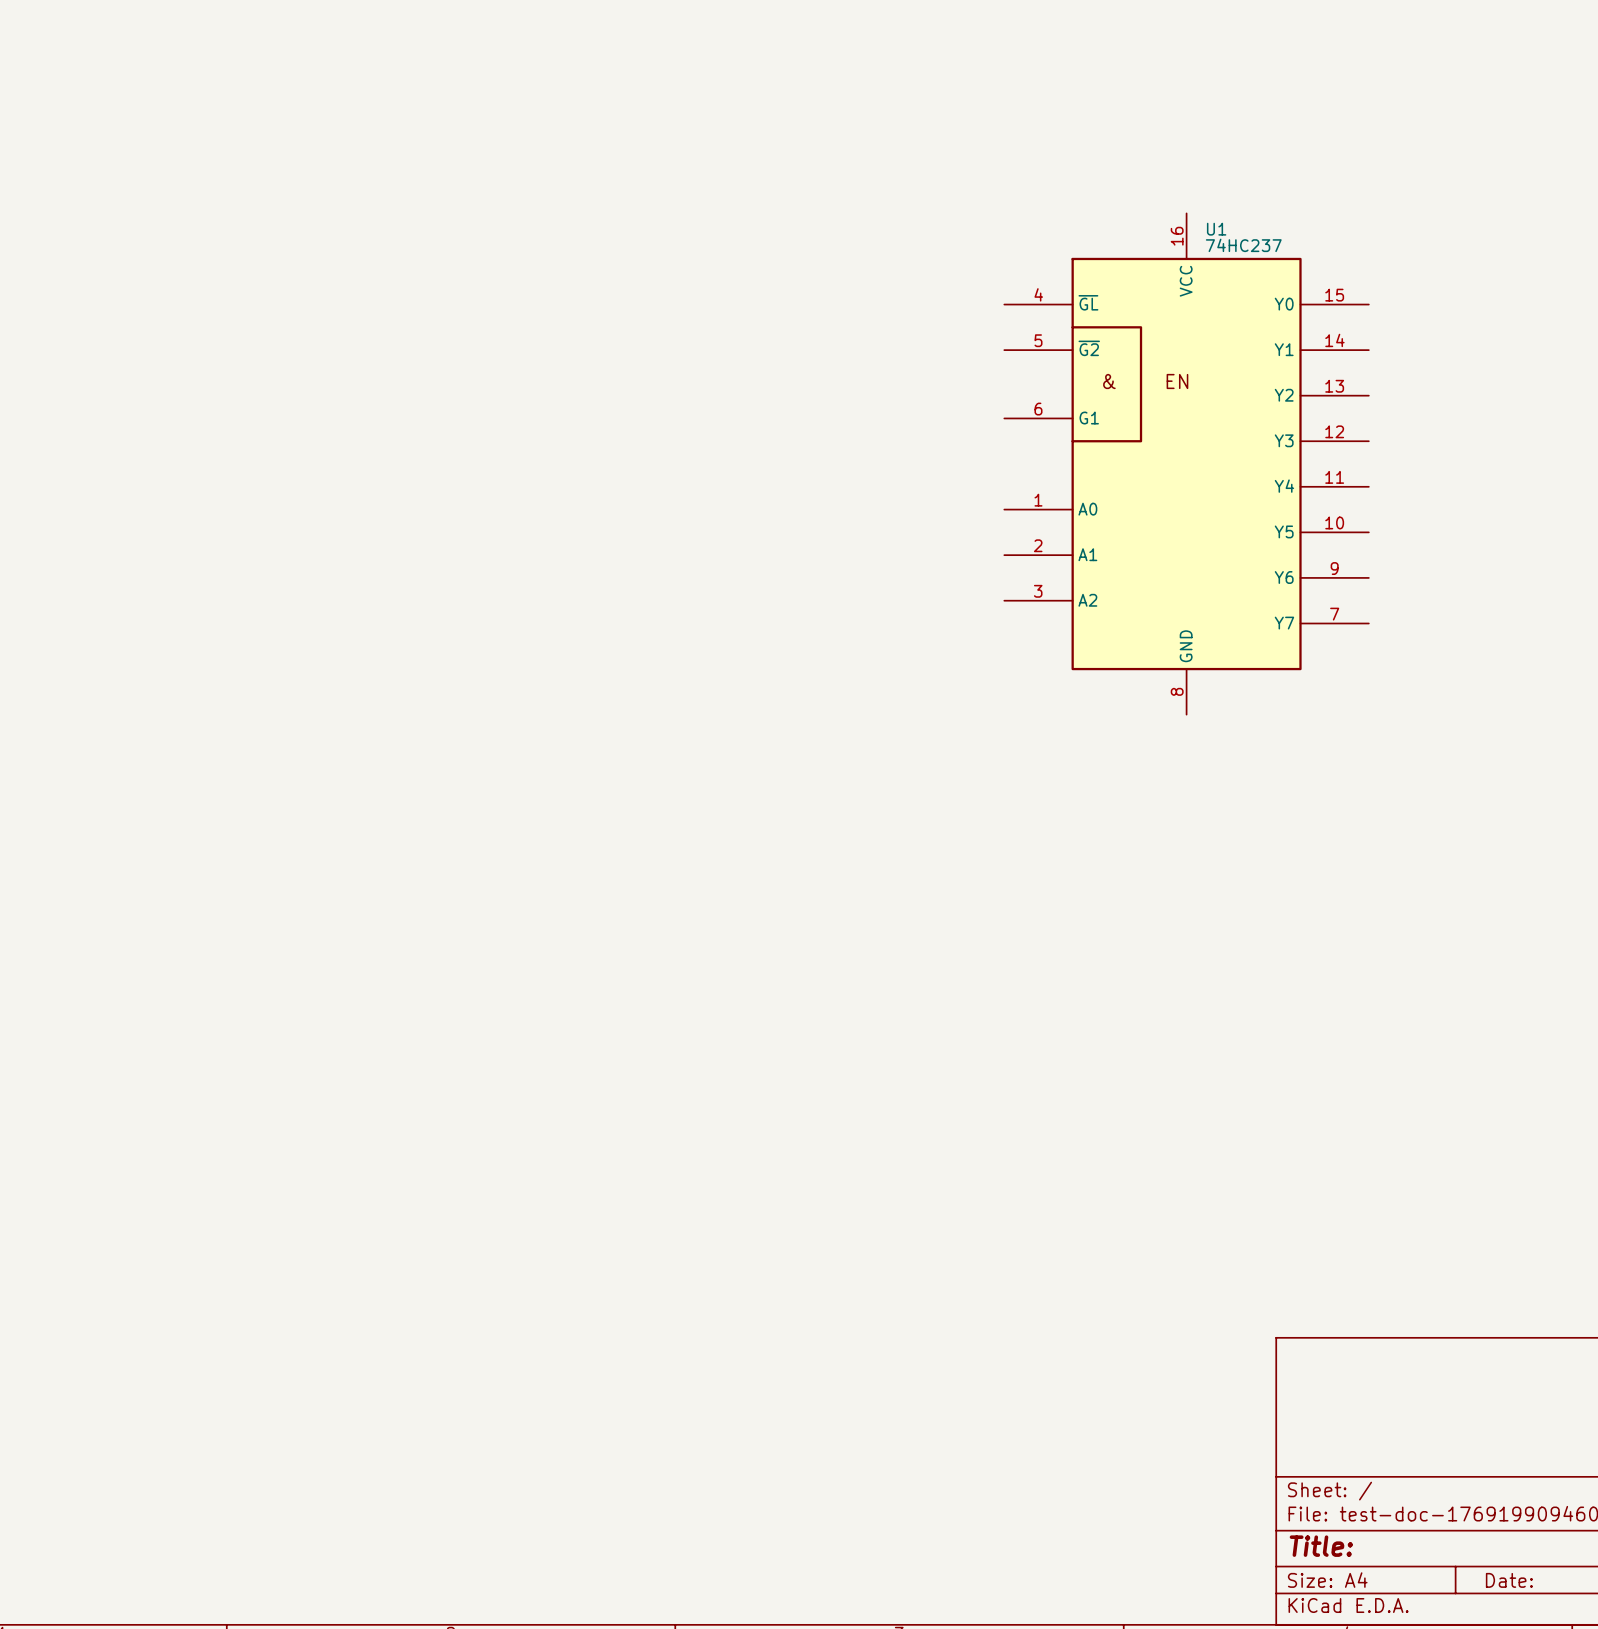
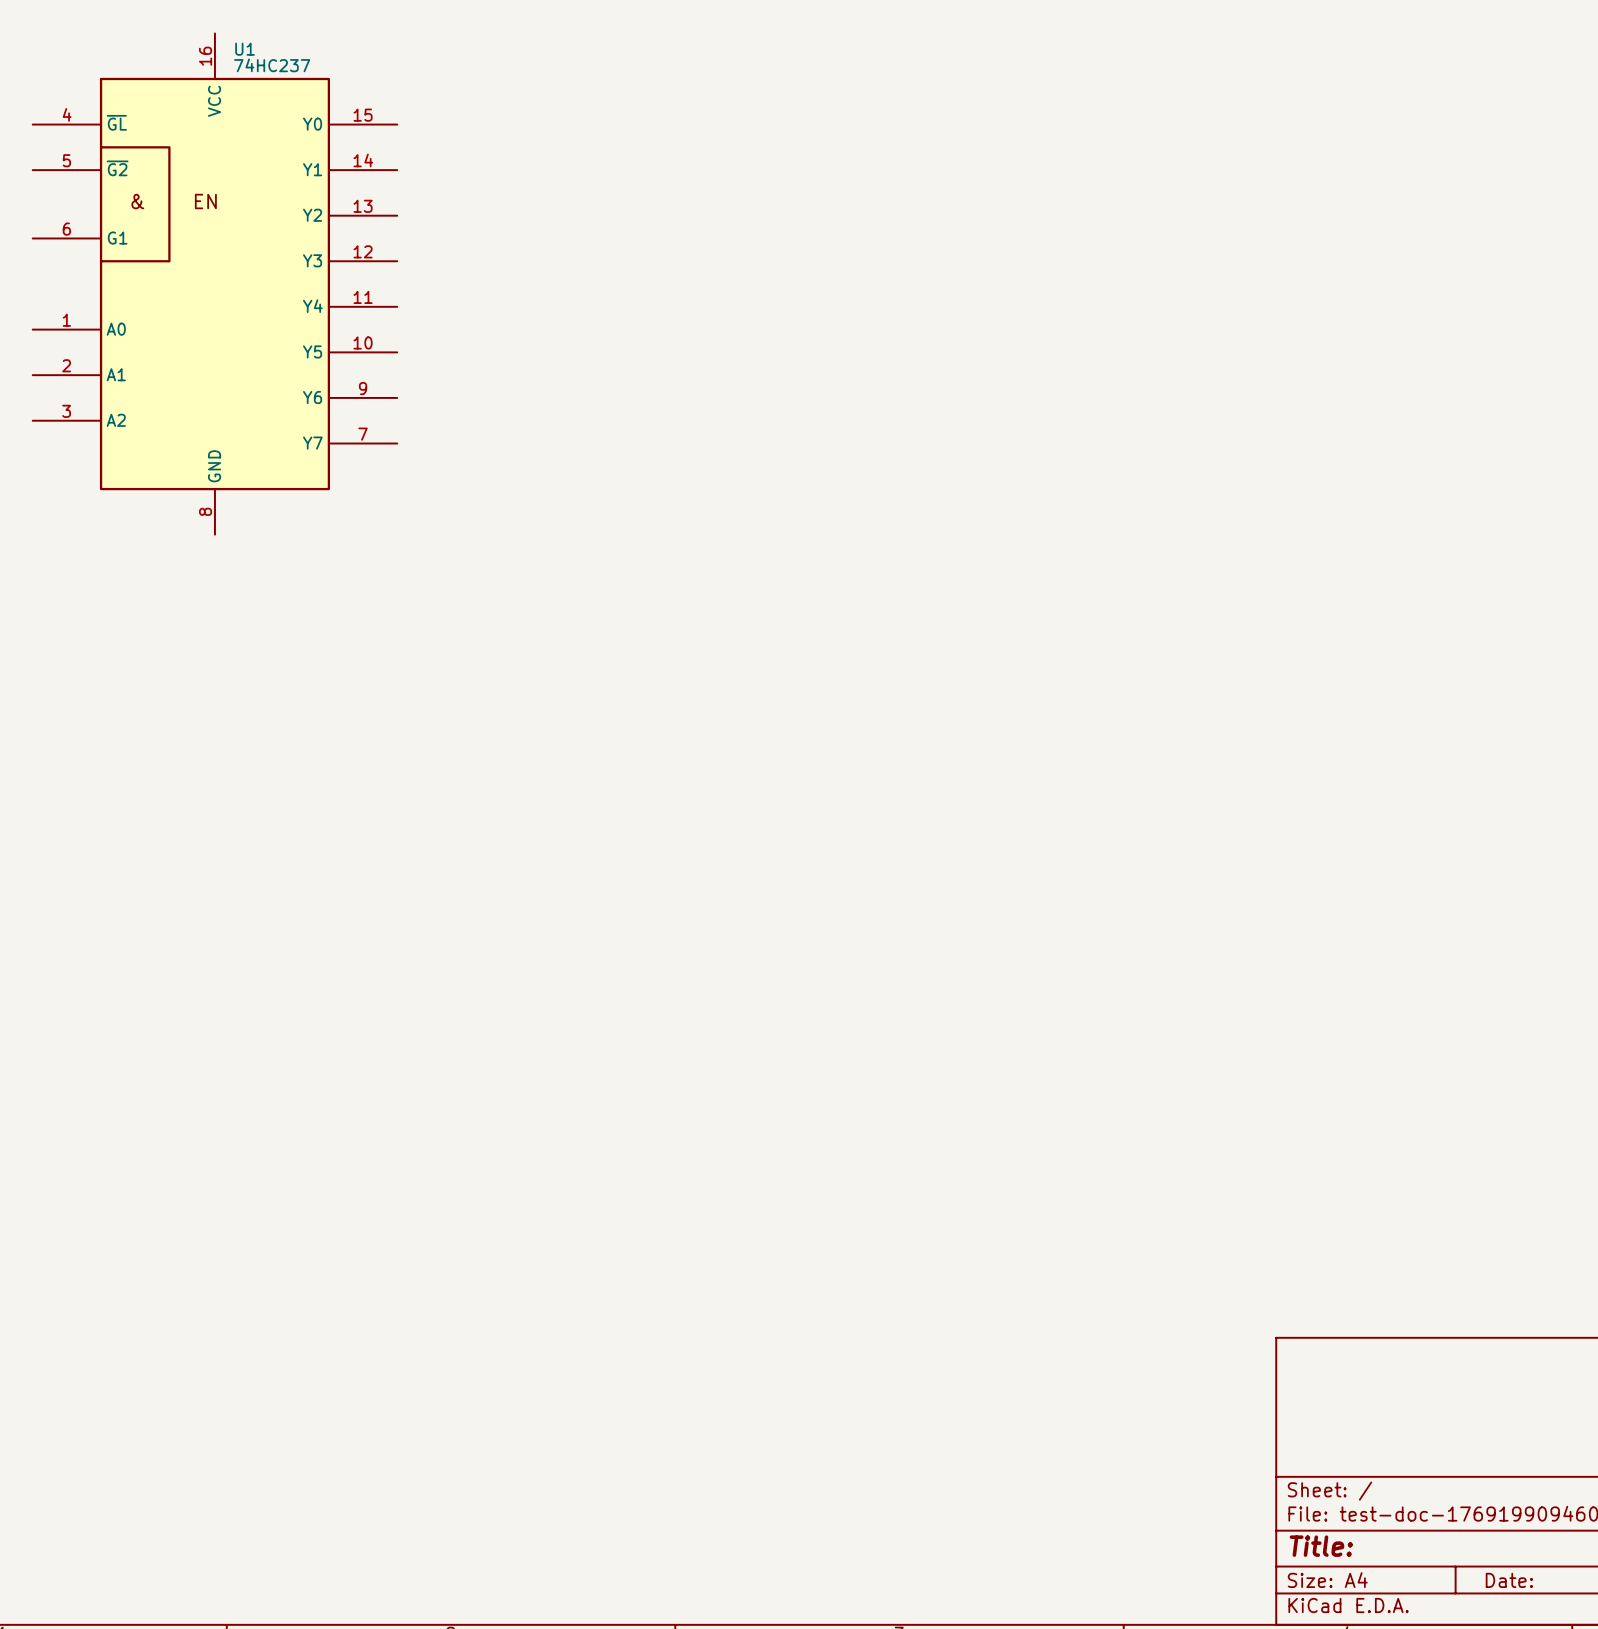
U1 symbol: [1004, 213, 1369, 715] -> [32, 33, 398, 535]

